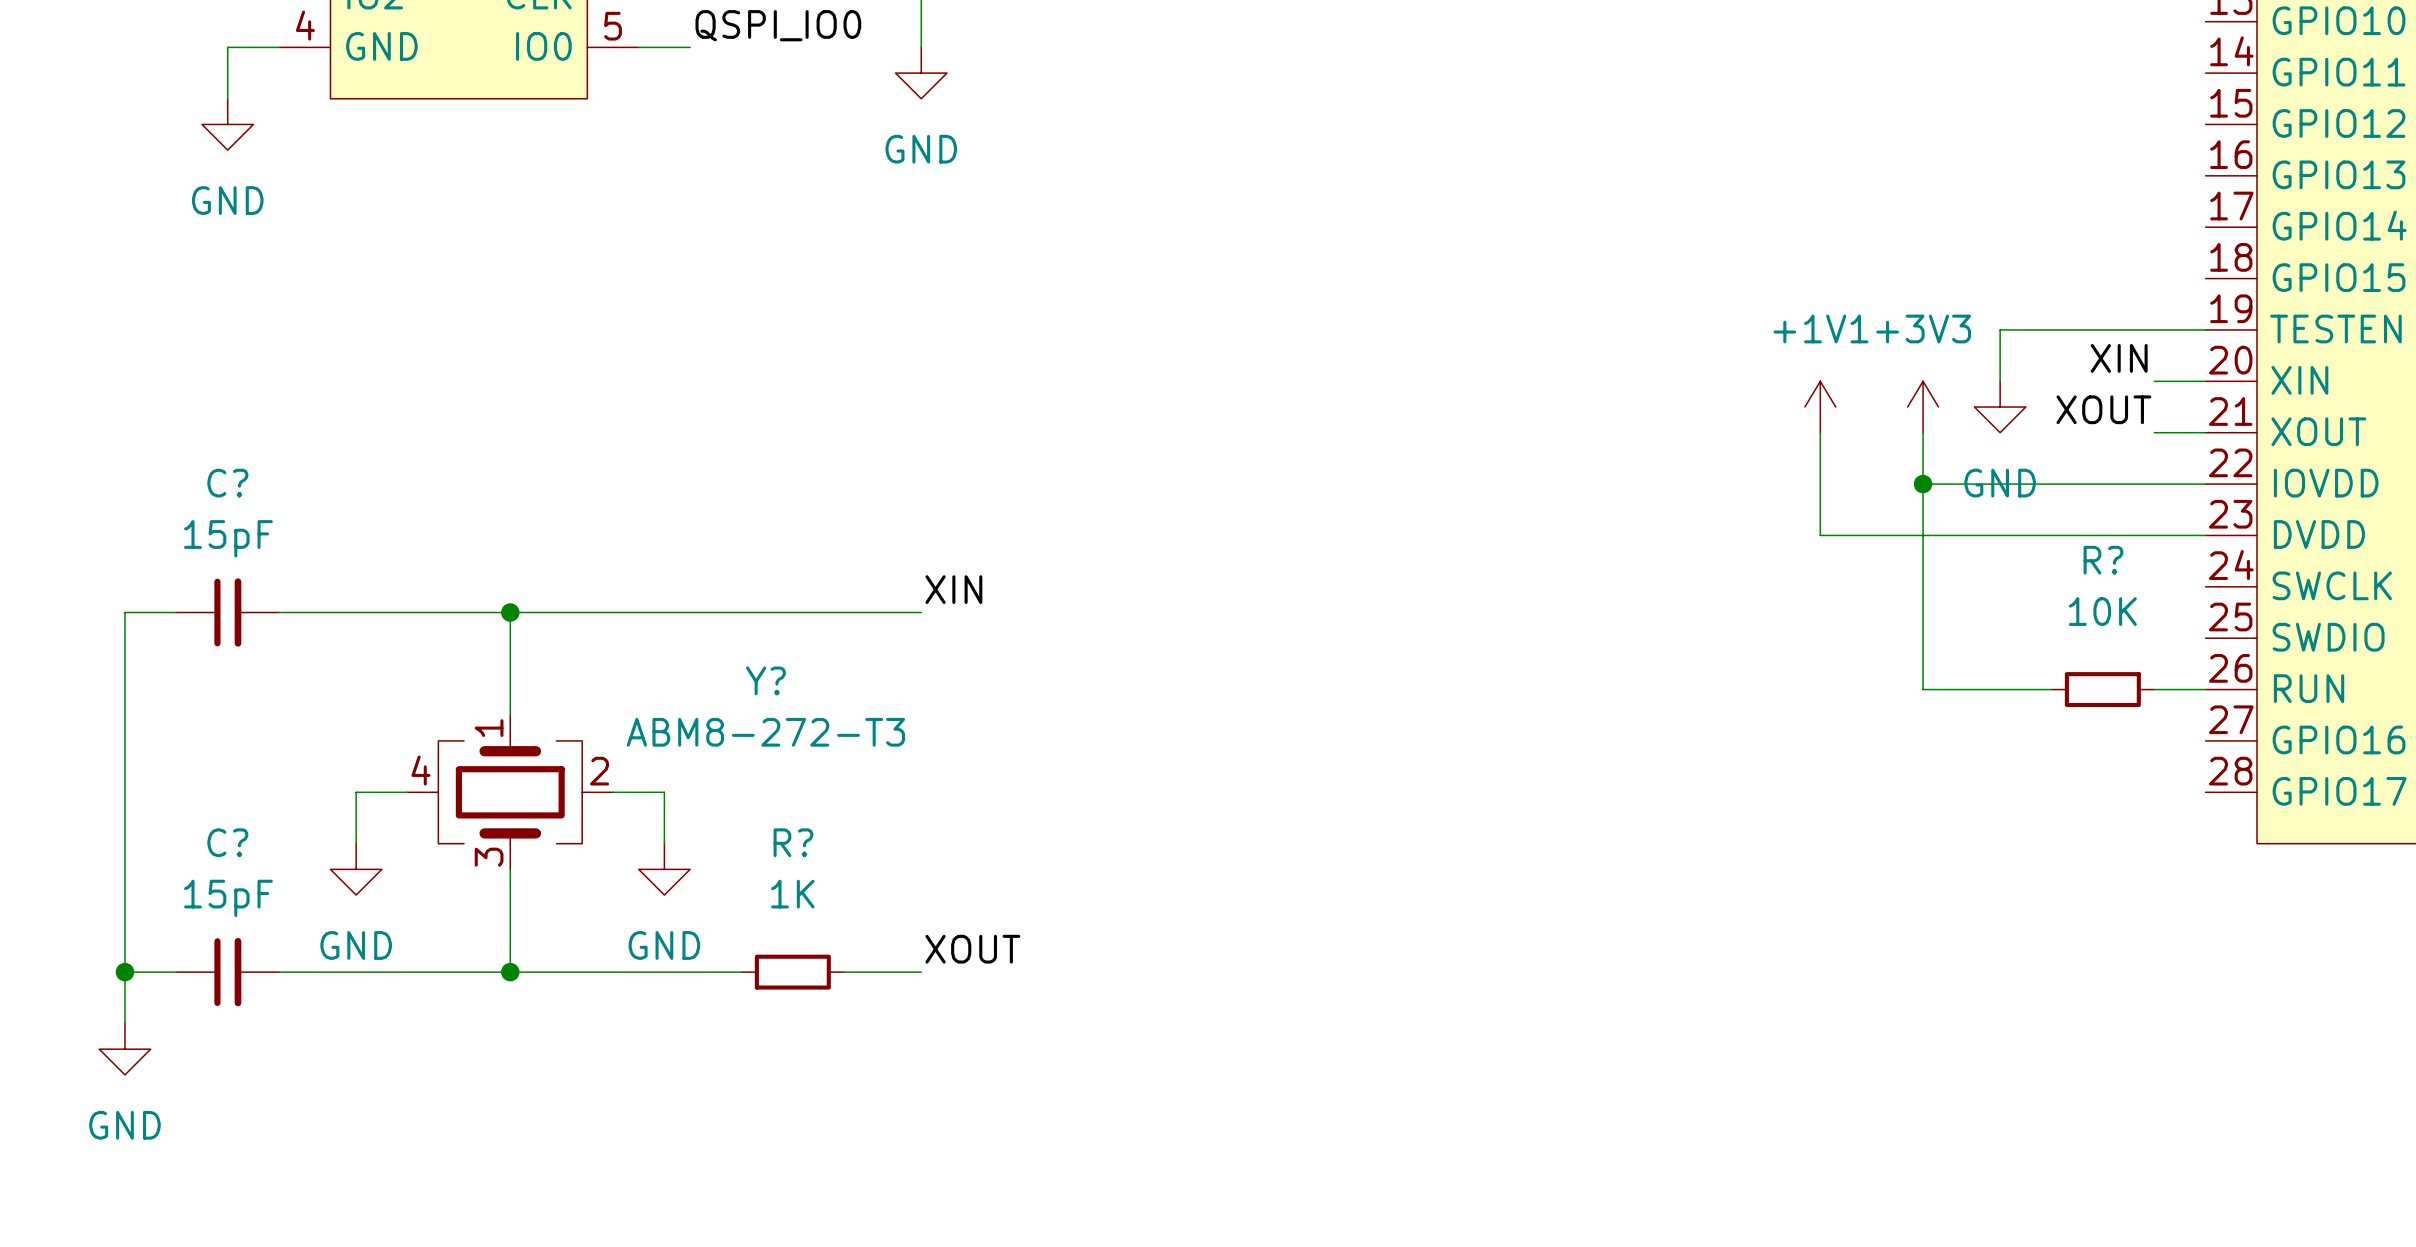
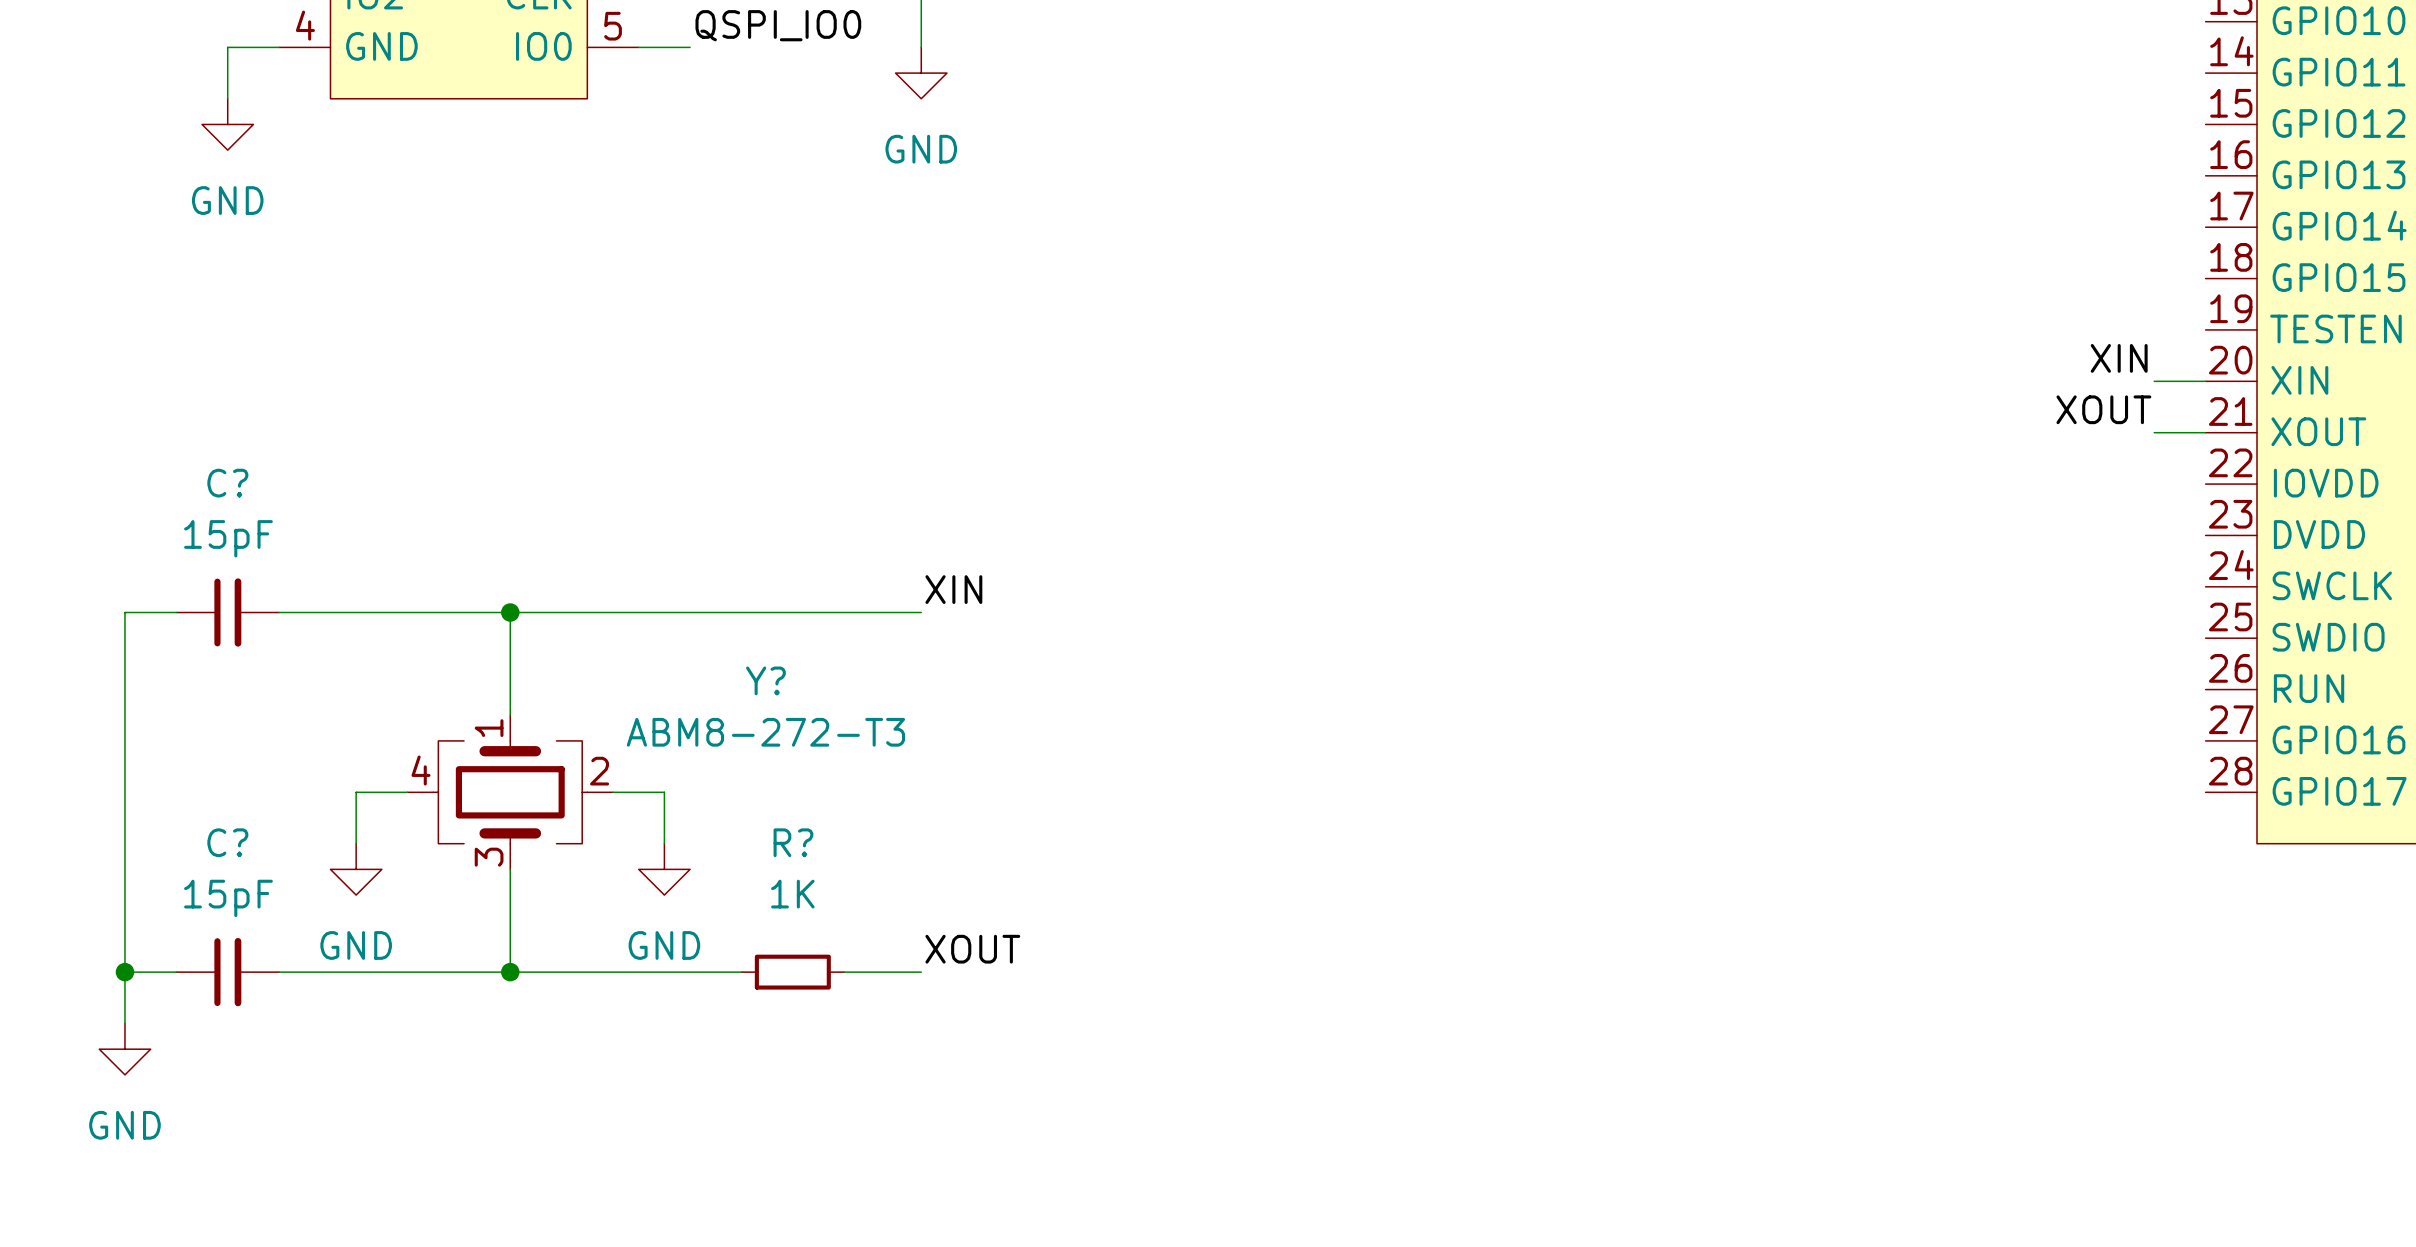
wire: (2205, 329) (2000, 329) (2000, 381) -> none
power symbol: +1V1 (1820, 407) -> none
power symbol: +3V3 (1923, 407) -> none
power symbol: GND (2000, 407) -> none
wire: (1820, 432) (1820, 535) (2205, 535) -> none
wire: (1923, 432) (1923, 689) (2051, 689) -> none
wire: (1923, 484) (2205, 484) -> none
junction: (1923, 484) -> none
R?: 10K (2102, 689) -> none
wire: (2154, 689) (2205, 689) -> none

